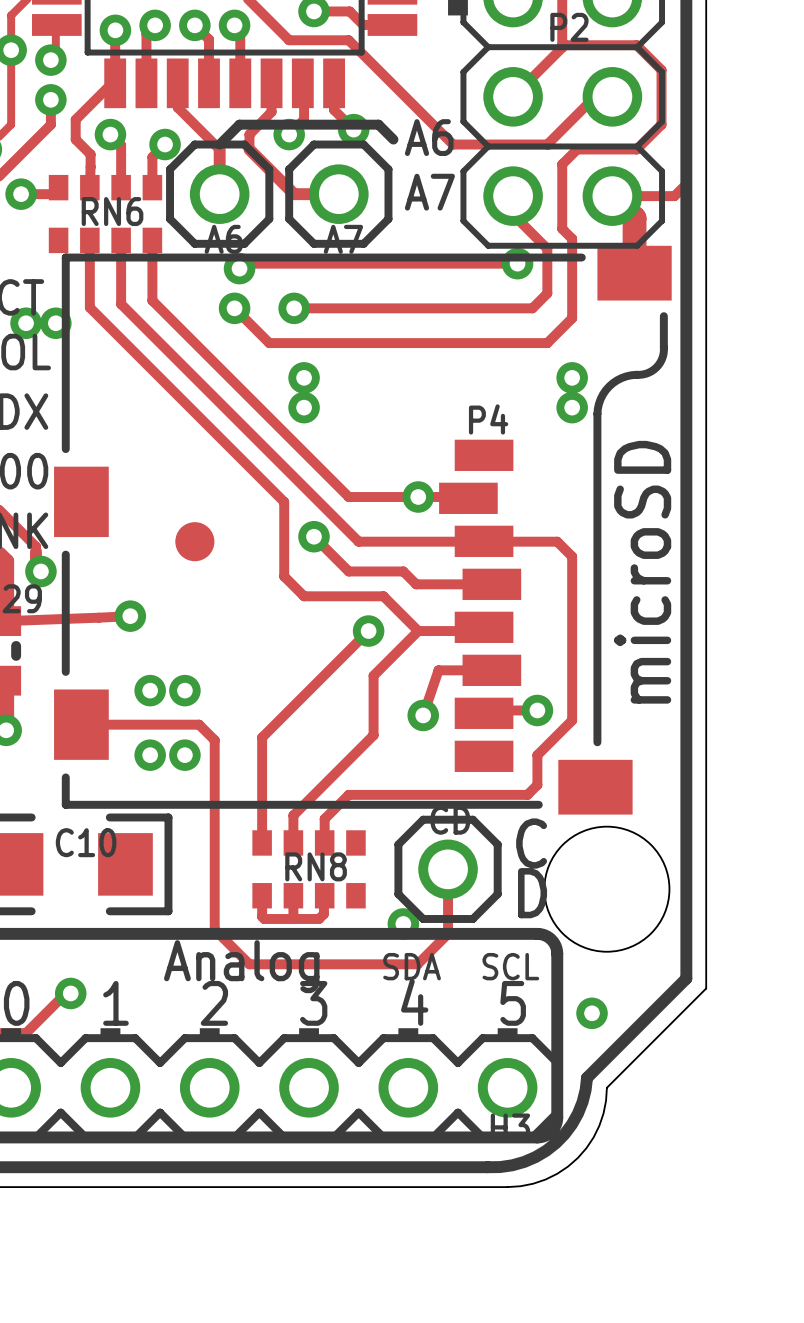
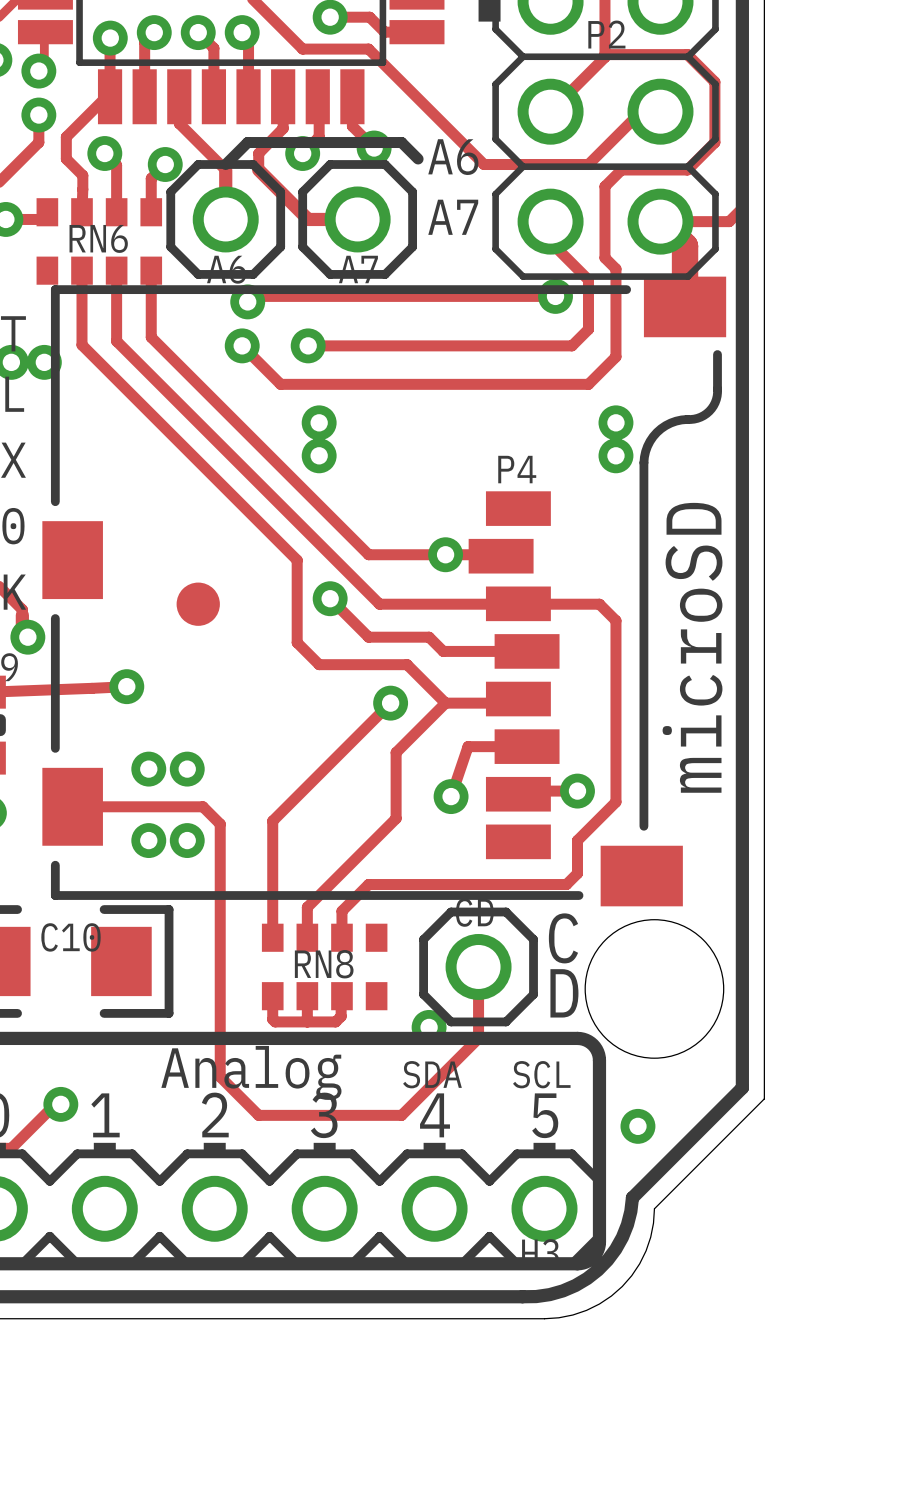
track: (214, 929) (249, 964) (417, 964) -> (220, 1033) (220, 1076) (258, 1115) (401, 1115) (444, 1072)

